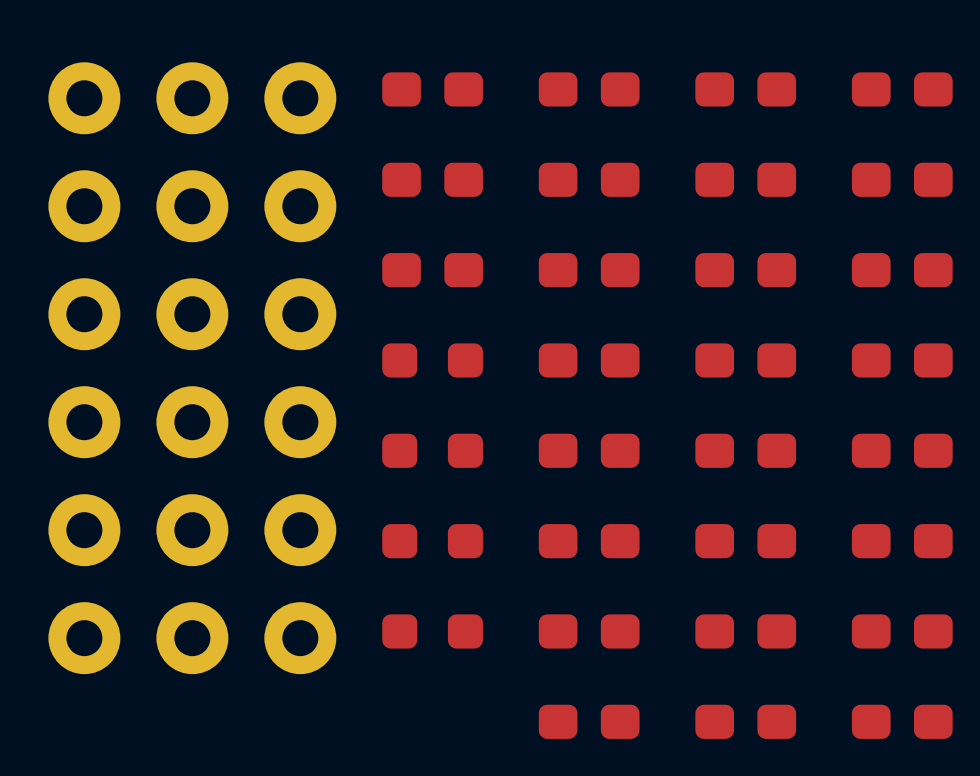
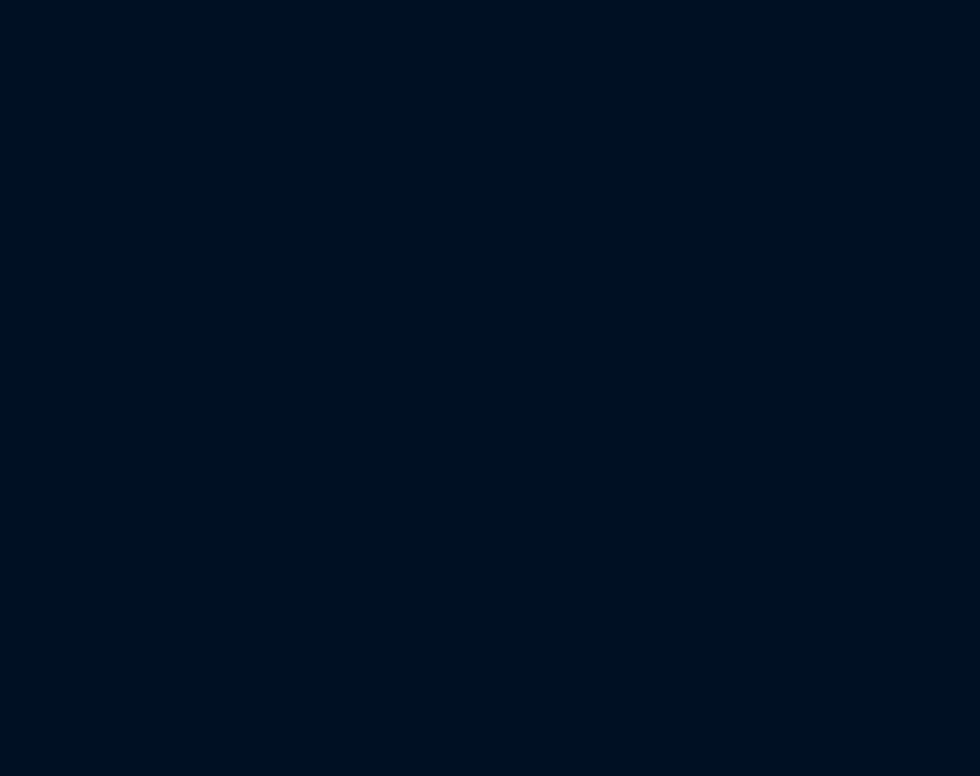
part: (432, 89) -> none
part: (589, 89) -> none
part: (745, 89) -> none
part: (902, 89) -> none
part: (84, 98) -> none
part: (192, 98) -> none
part: (300, 98) -> none
part: (432, 179) -> none
part: (589, 179) -> none
part: (745, 179) -> none
part: (902, 179) -> none
part: (84, 206) -> none
part: (192, 206) -> none
part: (300, 206) -> none
part: (432, 270) -> none
part: (589, 270) -> none
part: (745, 270) -> none
part: (902, 270) -> none
part: (84, 314) -> none
part: (192, 314) -> none
part: (300, 314) -> none
part: (432, 360) -> none
part: (589, 360) -> none
part: (745, 360) -> none
part: (902, 360) -> none
part: (84, 422) -> none
part: (192, 422) -> none
part: (300, 422) -> none
part: (432, 450) -> none
part: (589, 450) -> none
part: (745, 450) -> none
part: (902, 450) -> none
part: (84, 530) -> none
part: (192, 530) -> none
part: (300, 530) -> none
part: (432, 541) -> none
part: (589, 541) -> none
part: (745, 541) -> none
part: (902, 541) -> none
part: (432, 631) -> none
part: (589, 631) -> none
part: (745, 631) -> none
part: (902, 631) -> none
part: (84, 638) -> none
part: (192, 638) -> none
part: (300, 638) -> none
part: (589, 721) -> none
part: (745, 721) -> none
part: (902, 721) -> none

